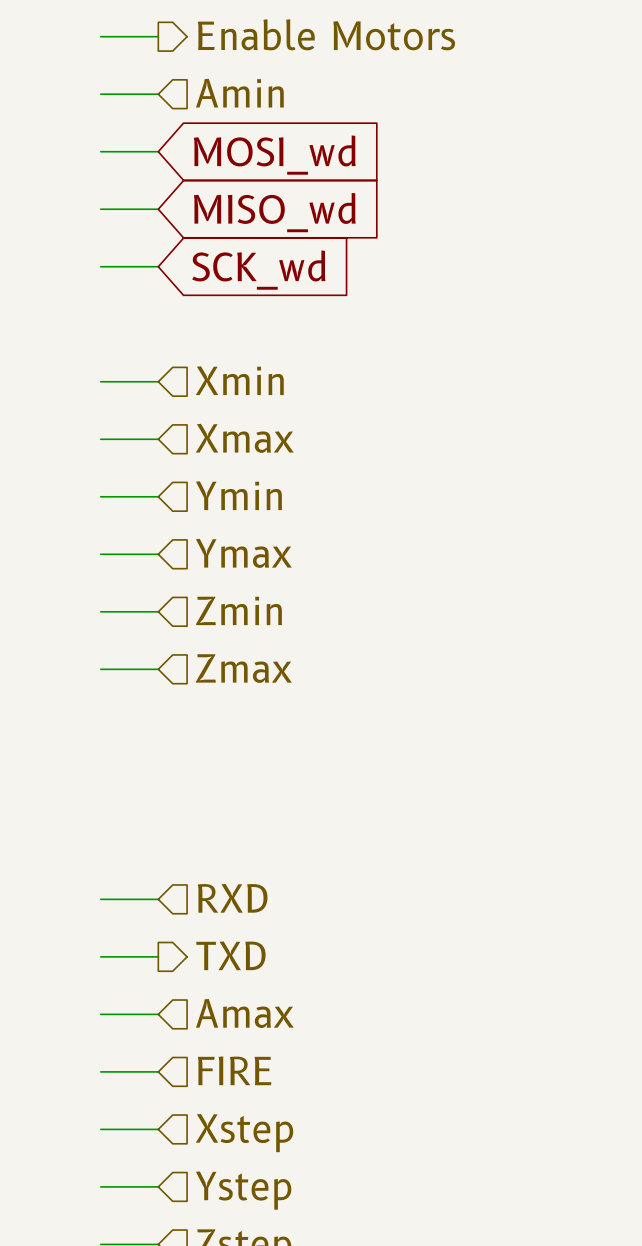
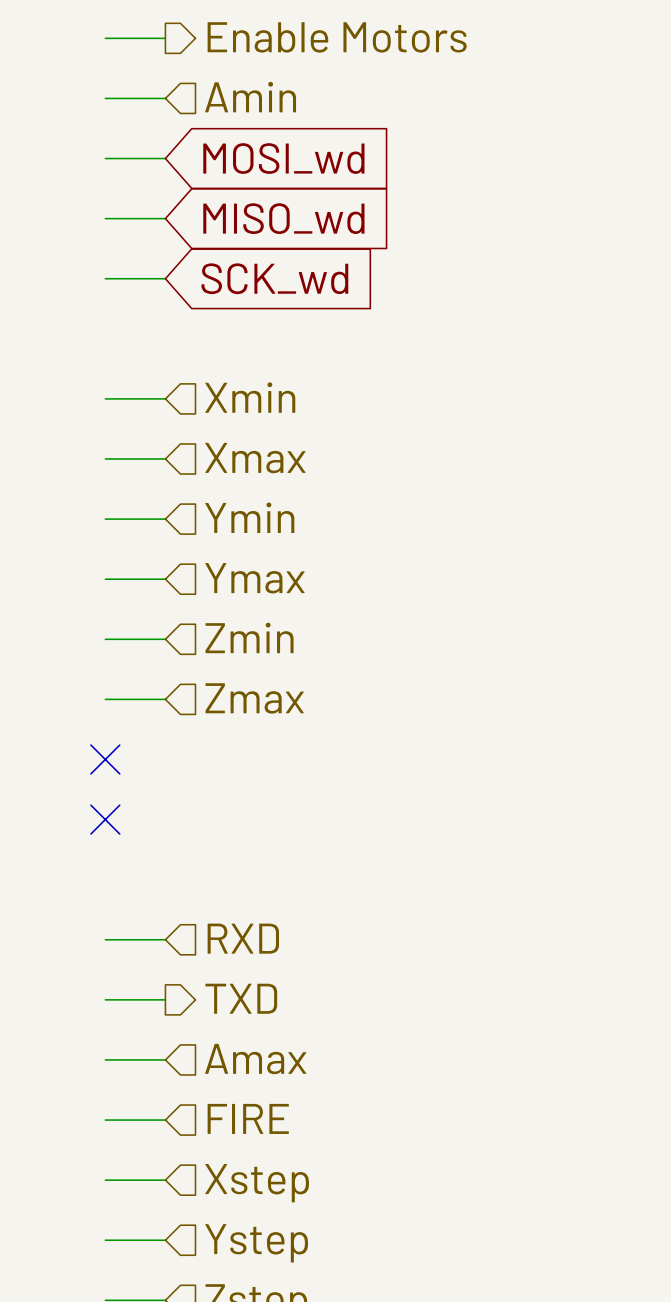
no-connect mark: none -> (105, 759)
no-connect mark: none -> (105, 819)

